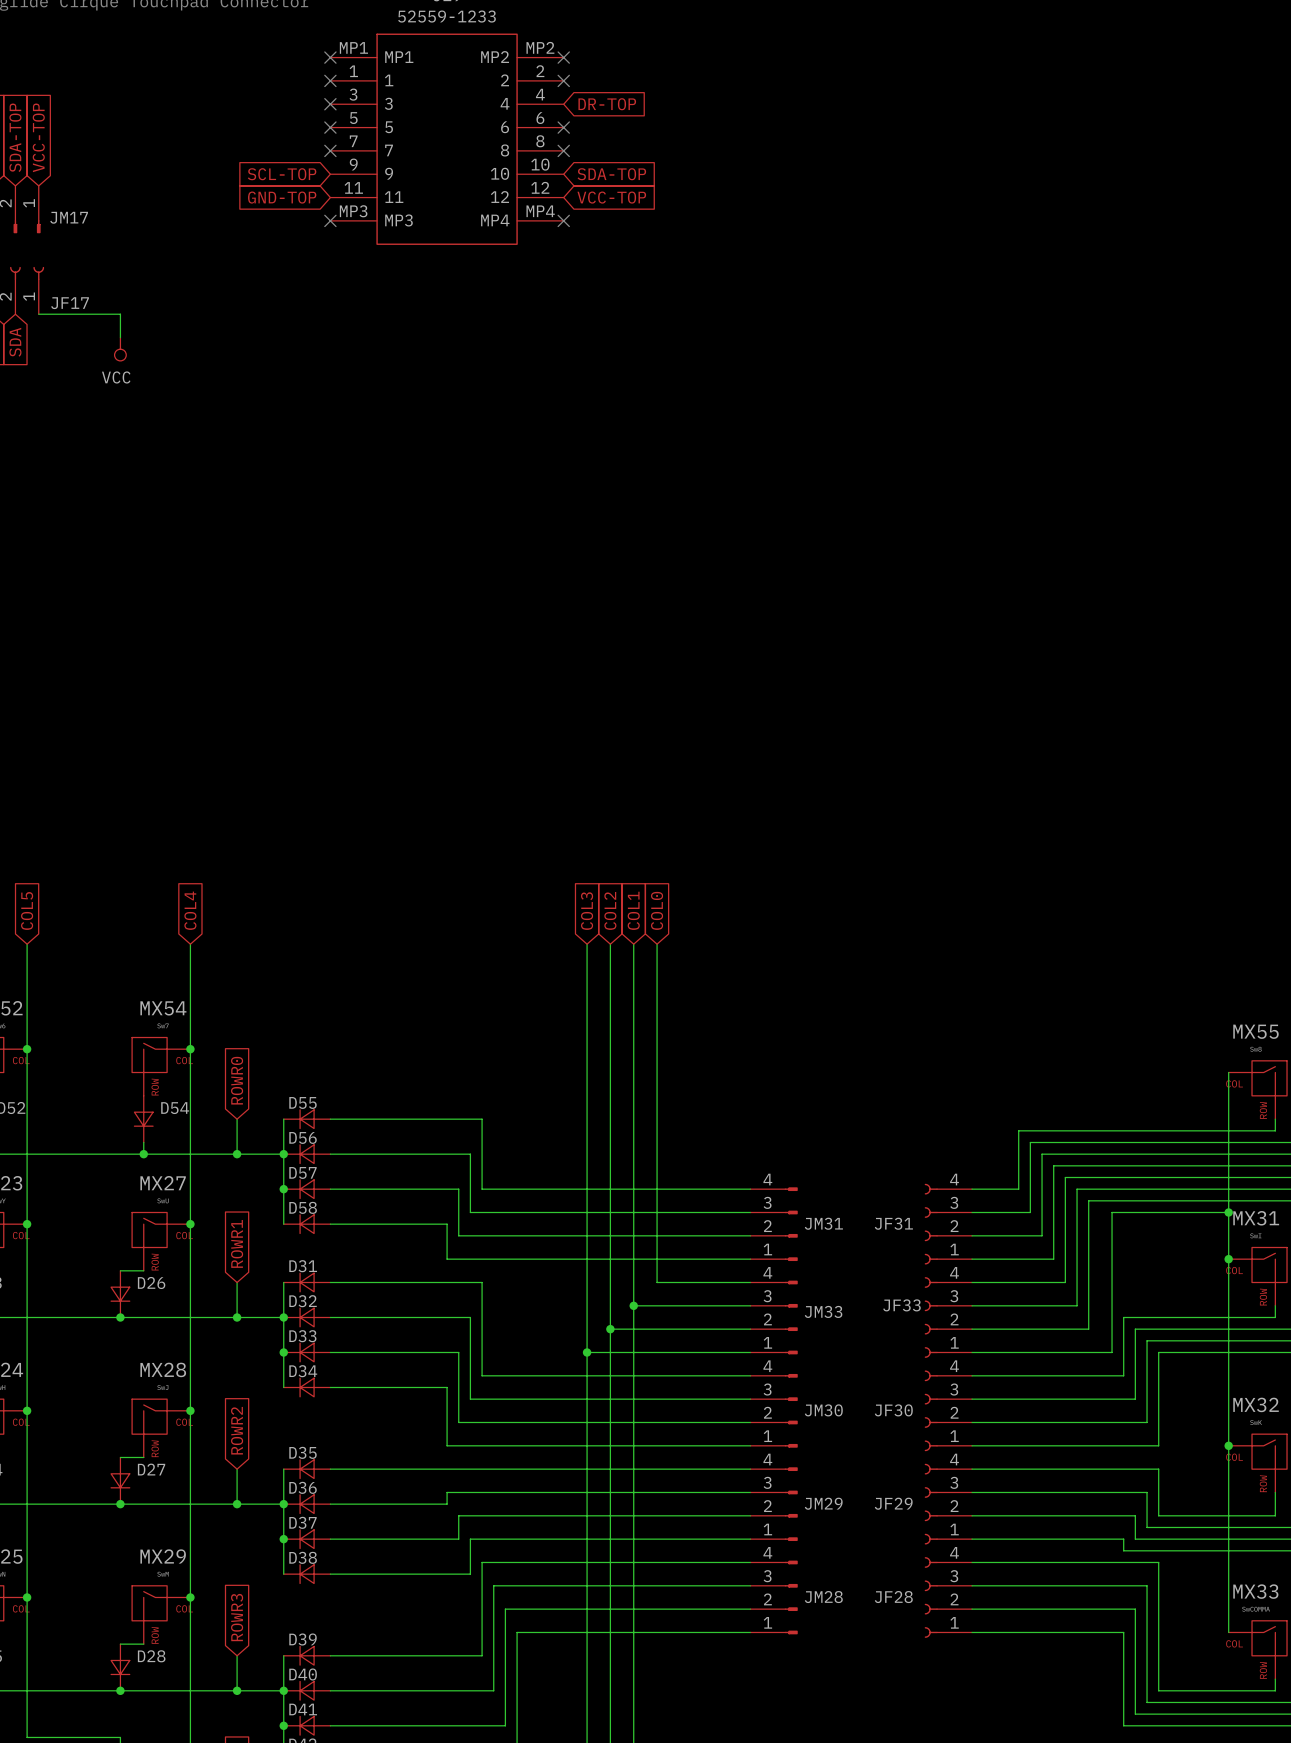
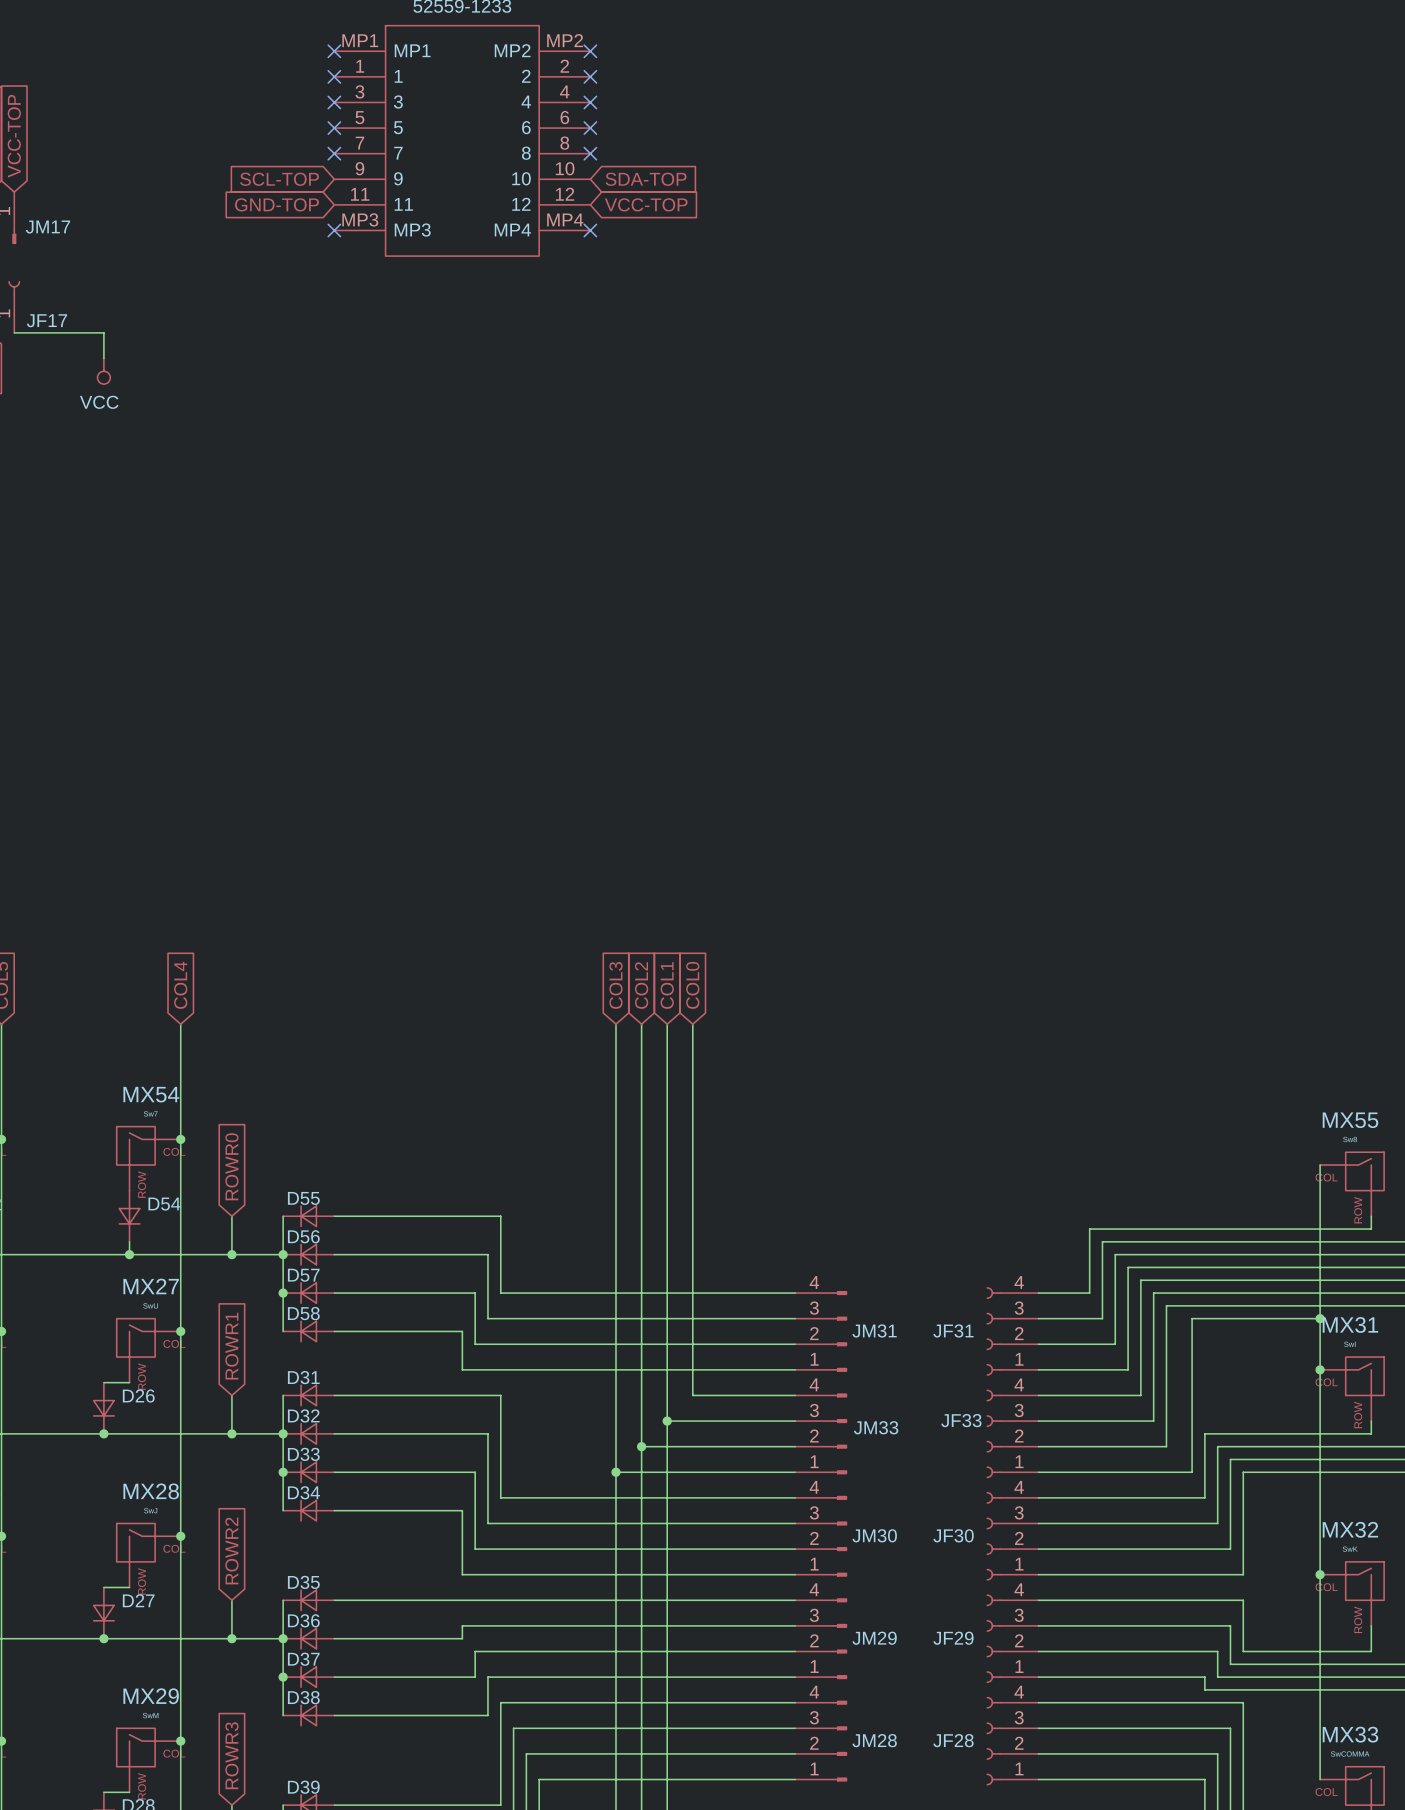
no-connect mark: none -> (590, 102)
global label: DR-TOP (607, 104) -> none

